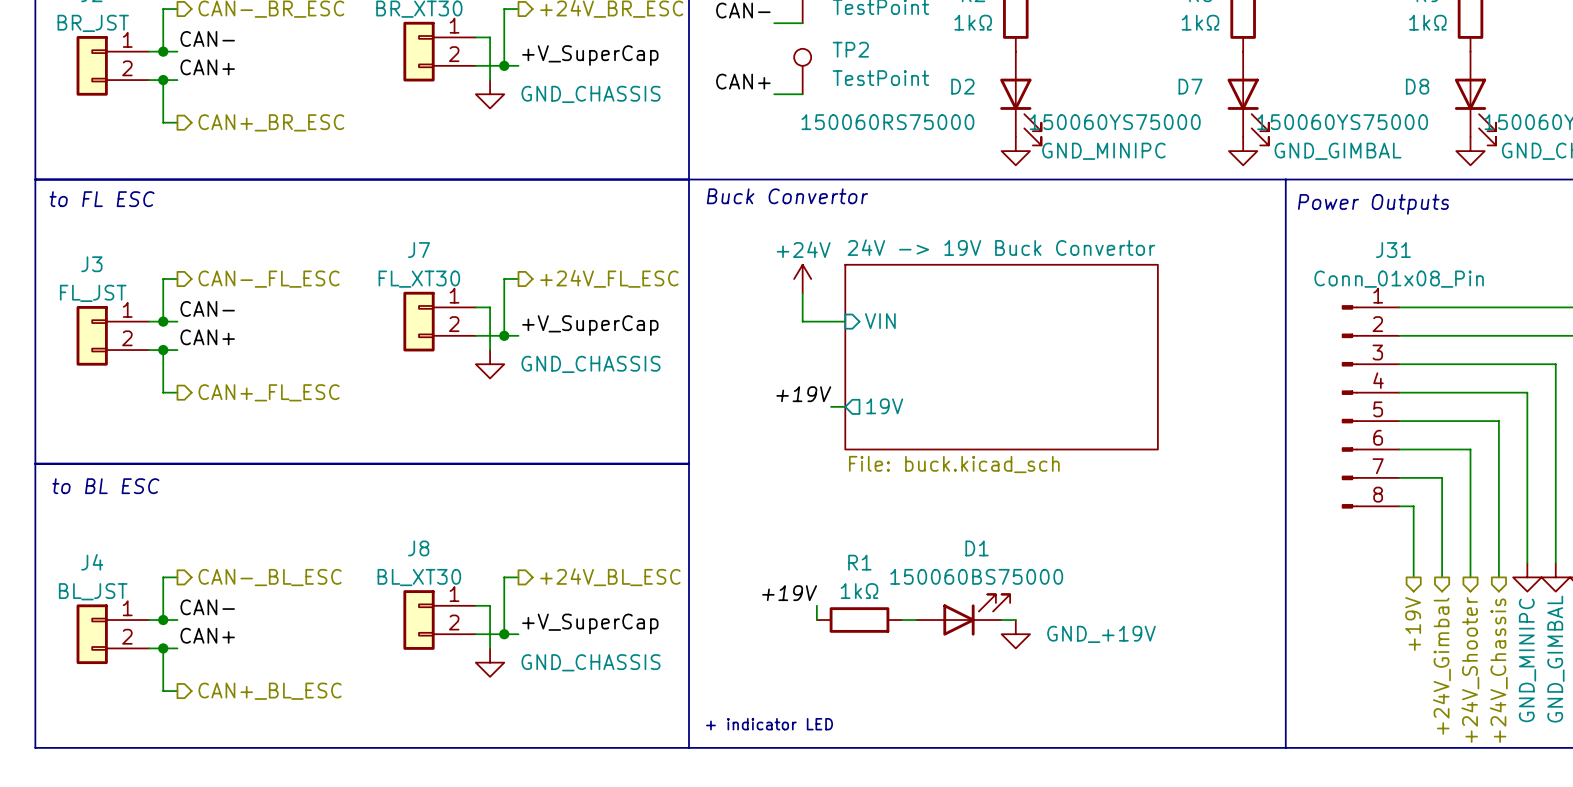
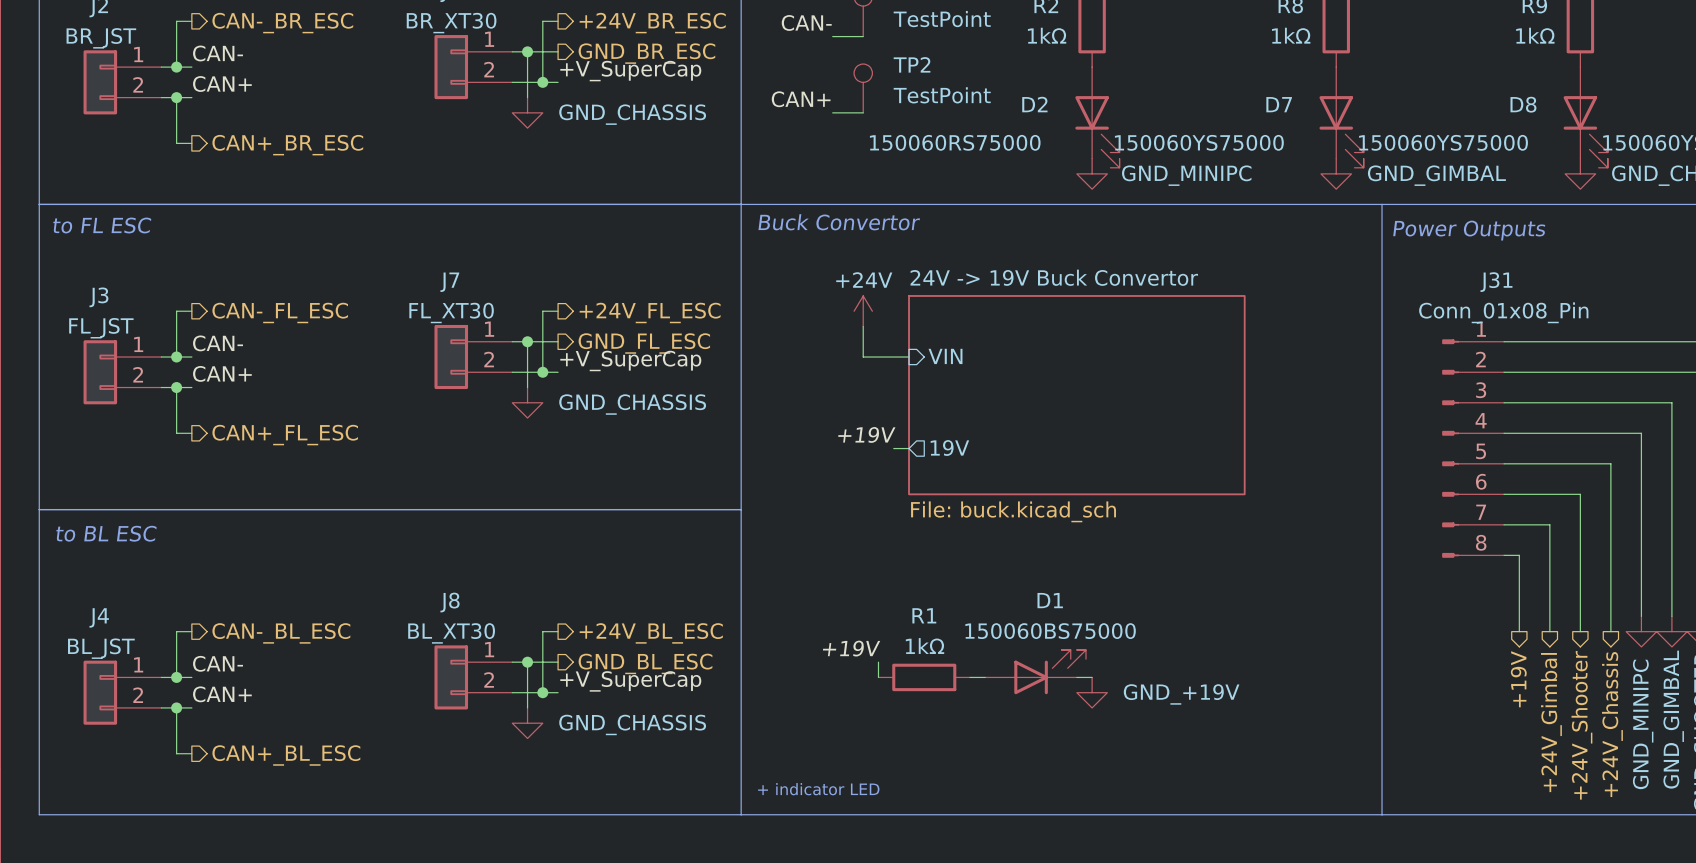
wire: none -> (527, 51) (558, 51)
junction: none -> (527, 51)
hierarchical label: none -> GND_BR_ESC (646, 53)
wire: none -> (527, 341) (558, 341)
junction: none -> (527, 341)
hierarchical label: none -> GND_FL_ESC (644, 343)
wire: none -> (527, 662) (558, 662)
junction: none -> (527, 662)
hierarchical label: none -> GND_BL_ESC (645, 663)

